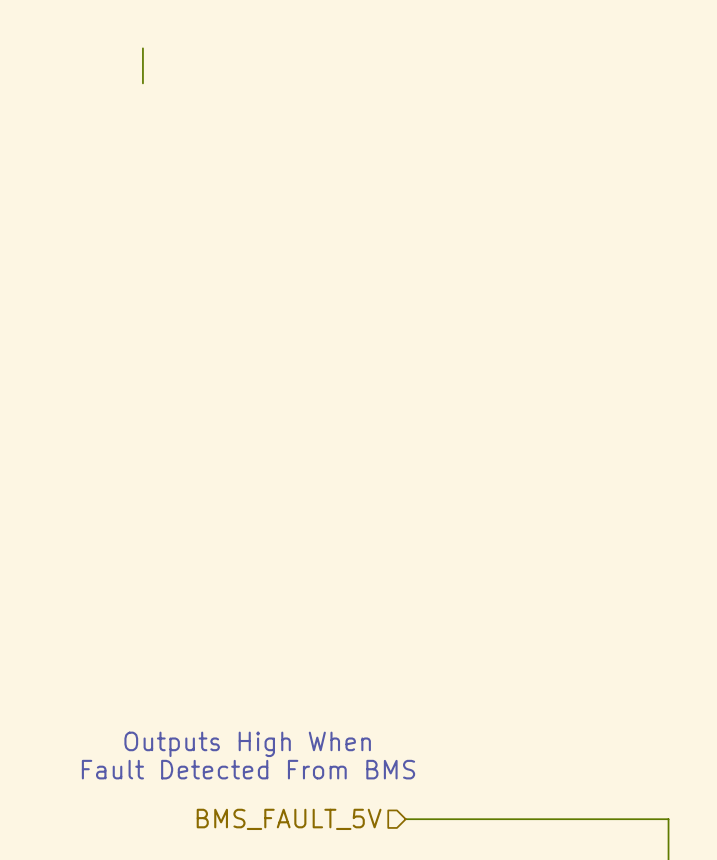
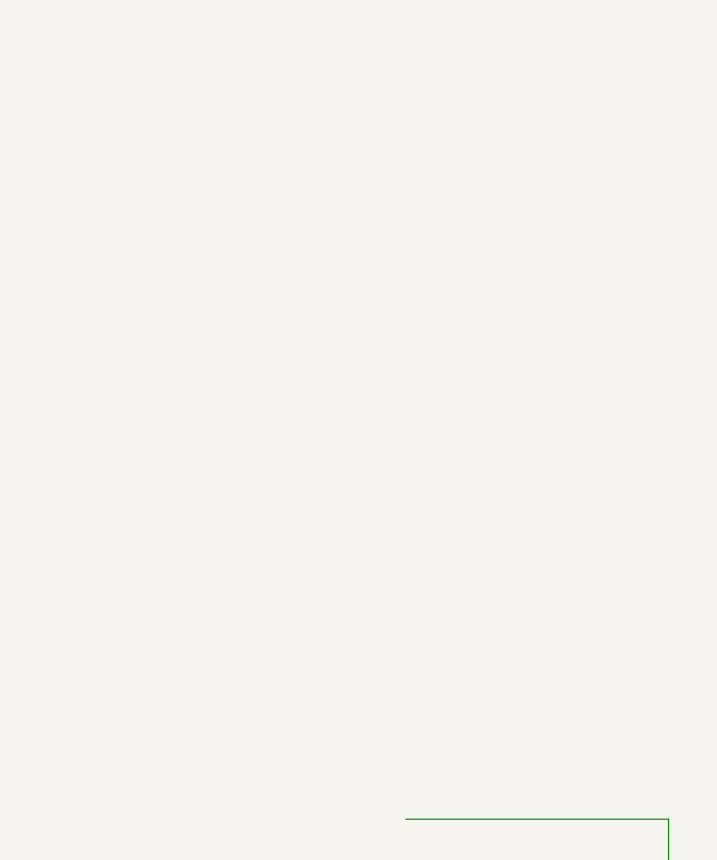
wire: (142, 48) (142, 83) -> none
text: Outputs High When (247, 744) -> none
text: Fault Detected From BMS (248, 769) -> none
hierarchical label: BMS_FAULT_5V (289, 819) -> none

